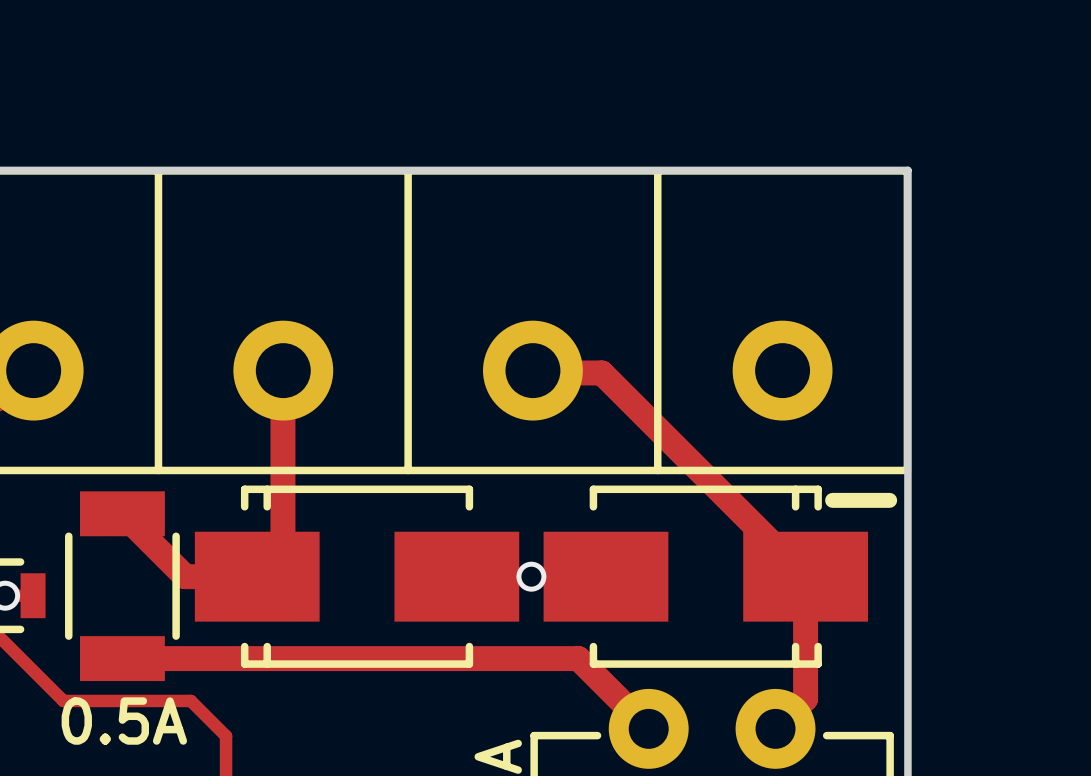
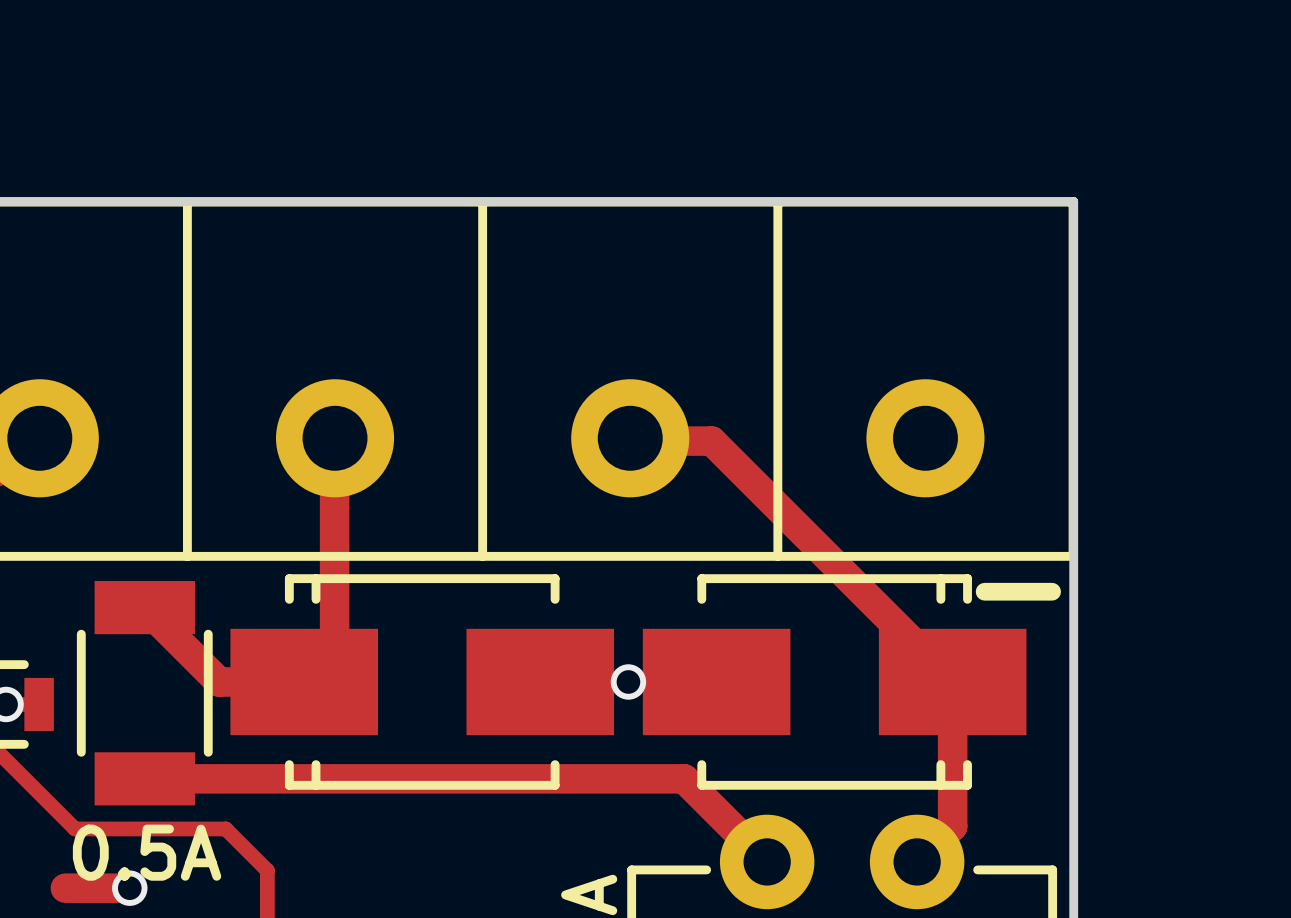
track: none -> (65, 888) (129, 888)
via: none -> (129, 888)

